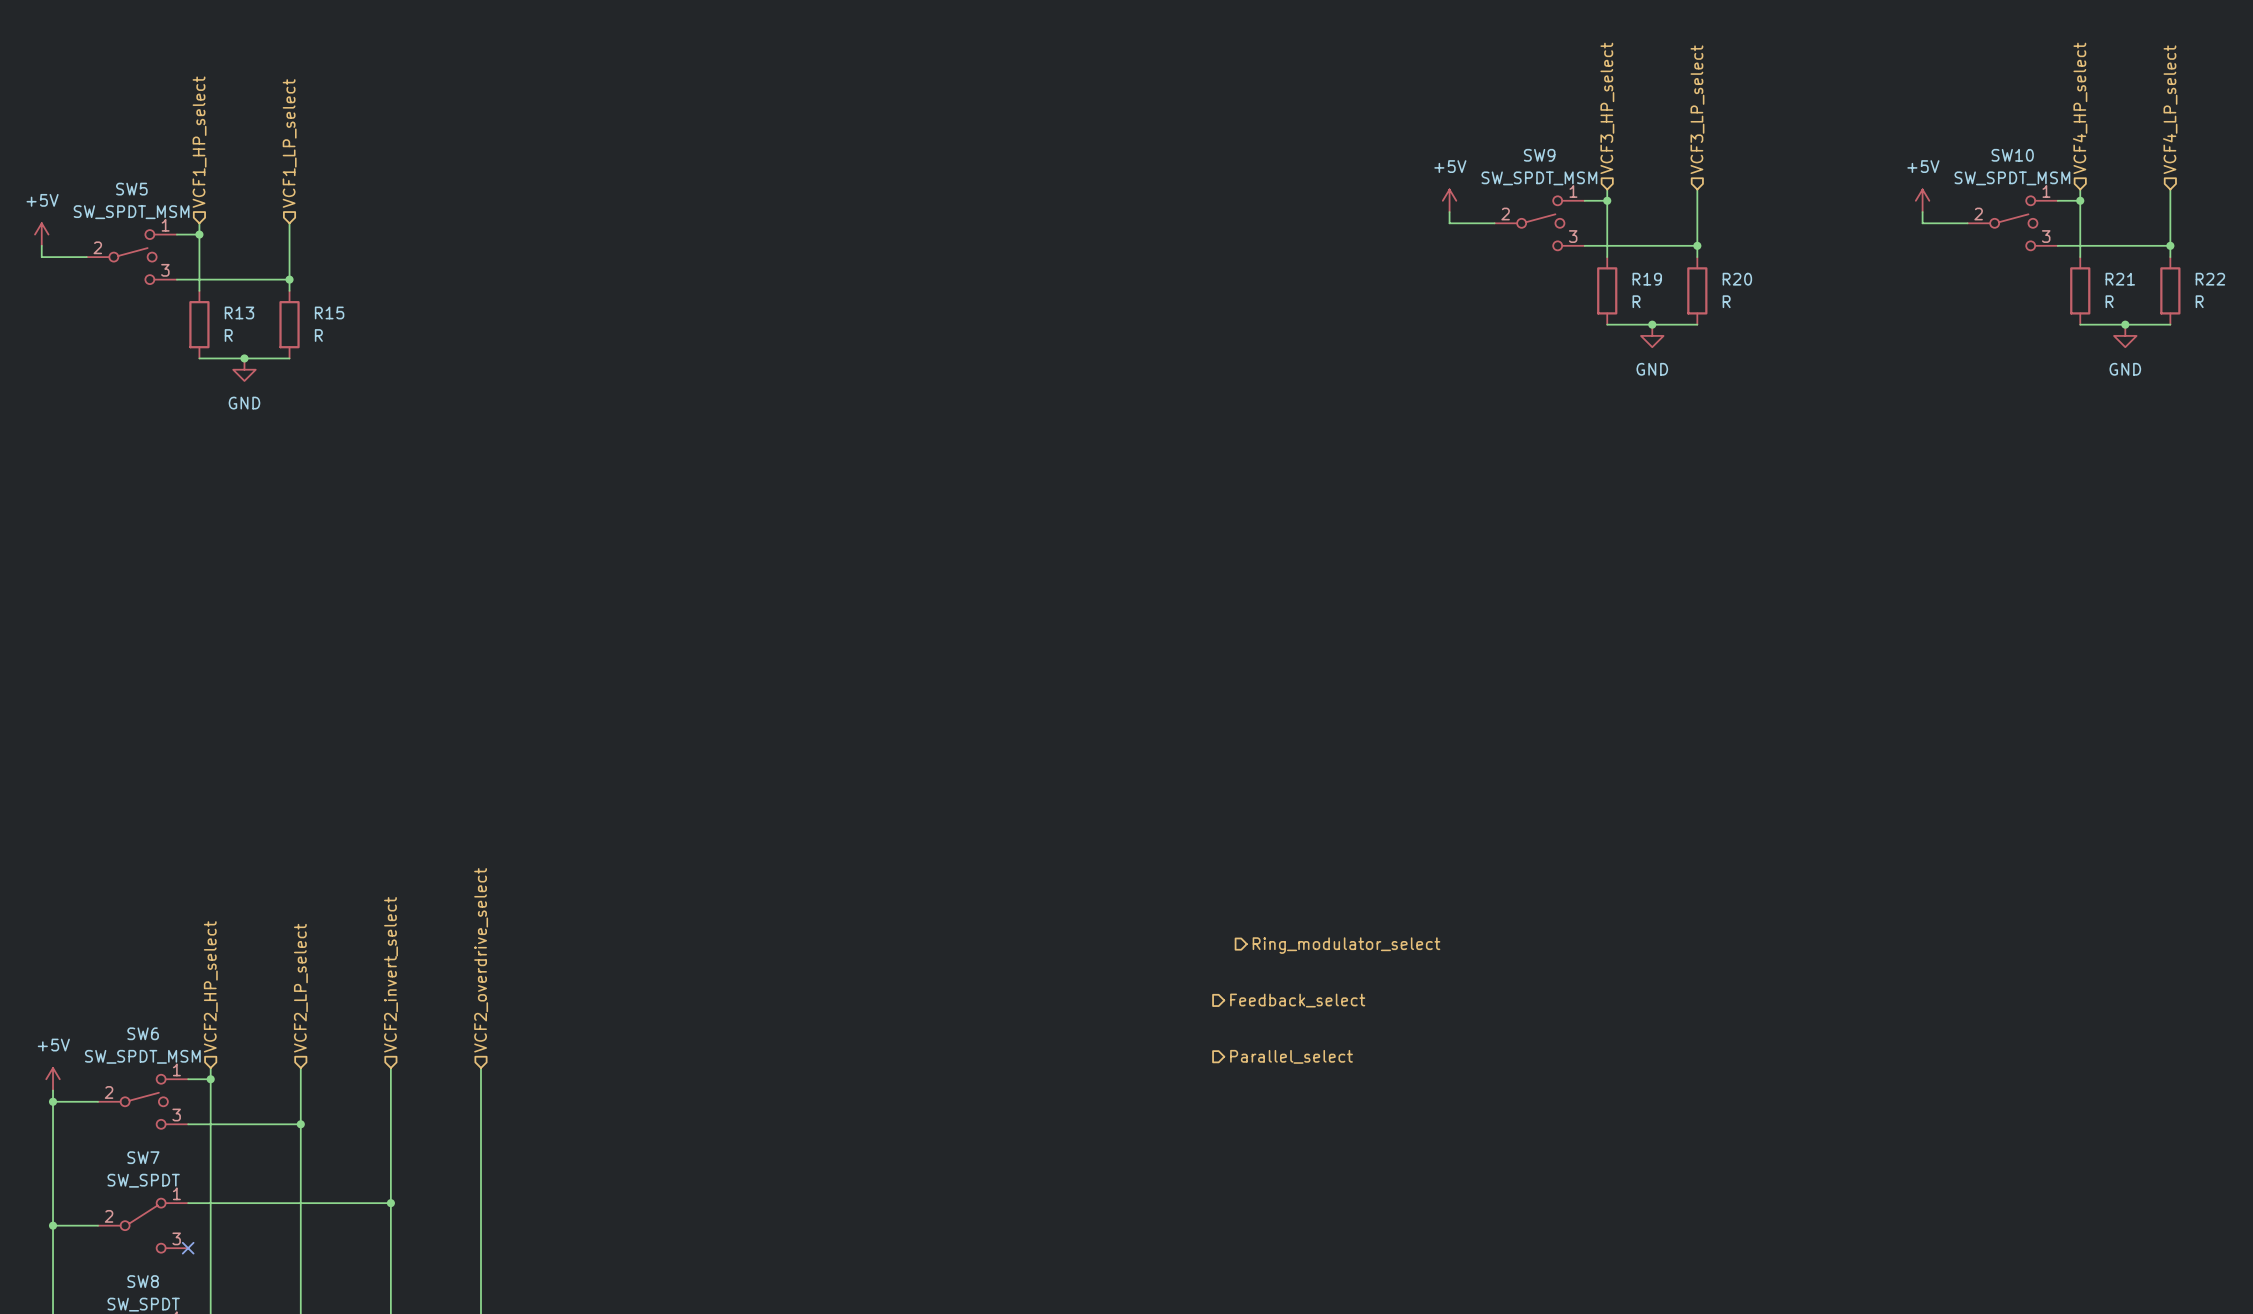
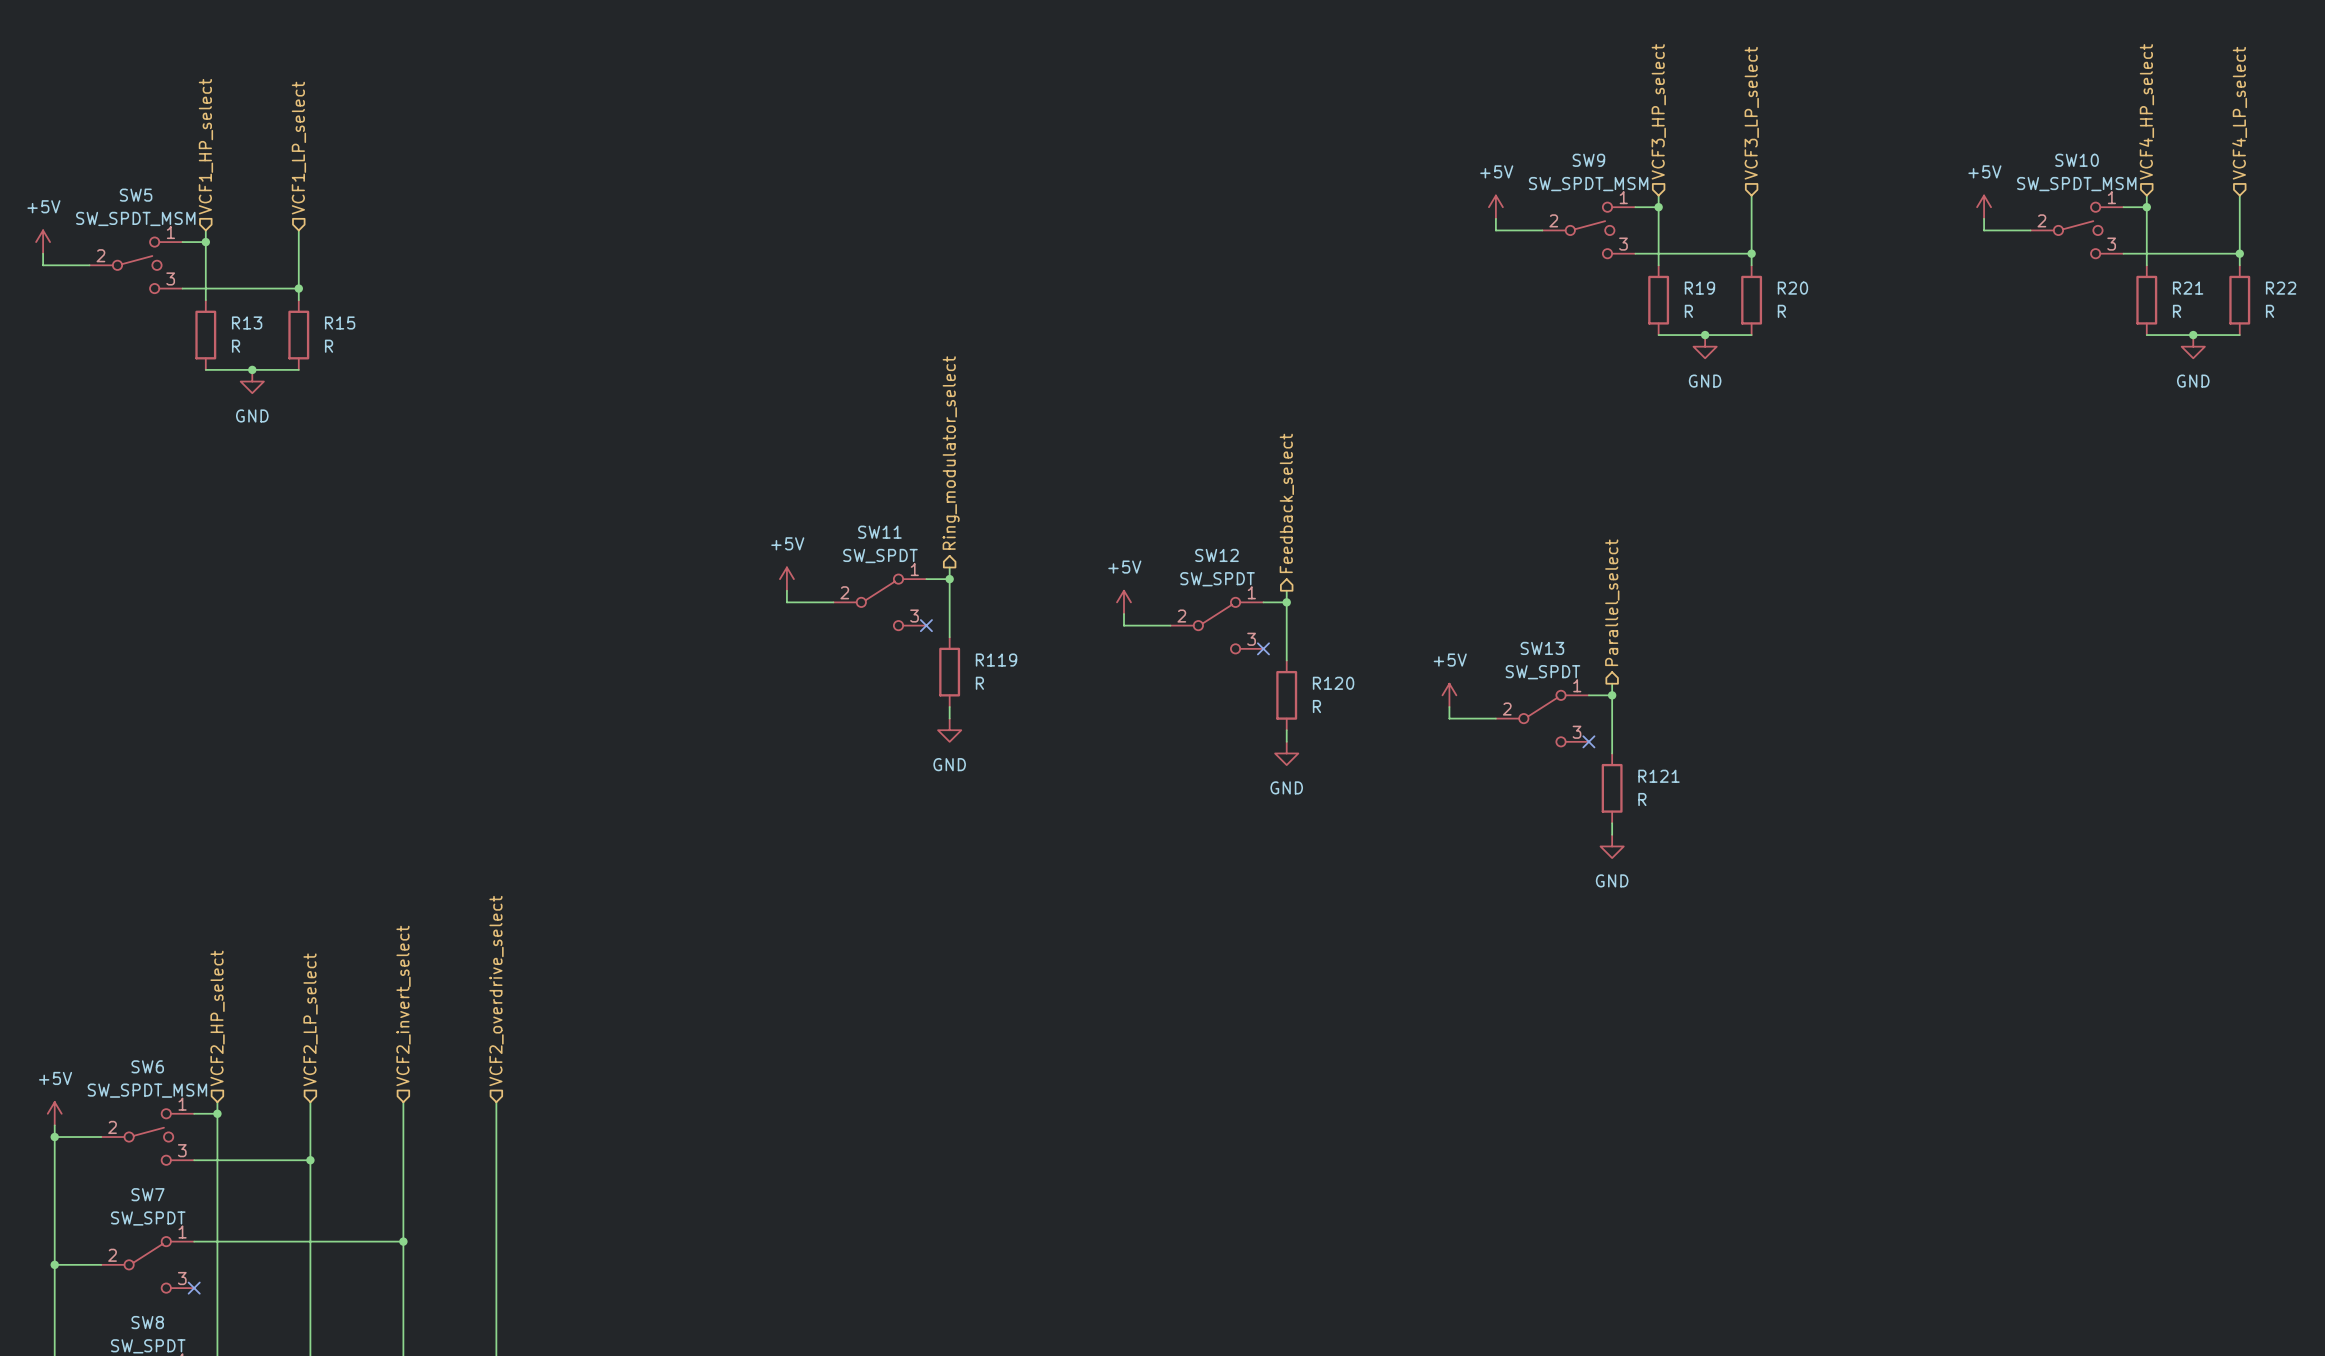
hierarchical label: none -> Ring_modulator_select (951, 453)
hierarchical label: none -> Feedback_select (1286, 503)
wire: none -> (949, 567) (949, 637)
power symbol: none -> +5V (786, 579)
wire: none -> (926, 579) (949, 579)
junction: none -> (949, 579)
wire: none -> (786, 590) (786, 602) (833, 602)
wire: none -> (1286, 590) (1286, 660)
SW11: none -> SW_SPDT (879, 602)
power symbol: none -> +5V (1123, 602)
wire: none -> (1263, 602) (1286, 602)
junction: none -> (1286, 602)
hierarchical label: none -> Parallel_select (1612, 602)
wire: none -> (1123, 613) (1123, 625) (1170, 625)
no-connect mark: none -> (926, 625)
SW12: none -> SW_SPDT (1216, 625)
no-connect mark: none -> (1263, 648)
R119: none -> R (949, 672)
wire: none -> (1612, 683) (1612, 753)
R120: none -> R (1286, 695)
power symbol: none -> +5V (1449, 695)
wire: none -> (1588, 695) (1612, 695)
junction: none -> (1612, 695)
wire: none -> (949, 706) (949, 718)
wire: none -> (1449, 706) (1449, 718) (1495, 718)
SW13: none -> SW_SPDT (1542, 718)
power symbol: none -> GND (949, 730)
wire: none -> (1286, 730) (1286, 741)
no-connect mark: none -> (1588, 741)
power symbol: none -> GND (1286, 753)
R121: none -> R (1612, 788)
wire: none -> (1612, 823) (1612, 834)
power symbol: none -> GND (1612, 846)
hierarchical label: Ring_modulator_select (1346, 945) -> none
hierarchical label: Feedback_select (1297, 1000) -> none
hierarchical label: Parallel_select (1291, 1056) -> none

